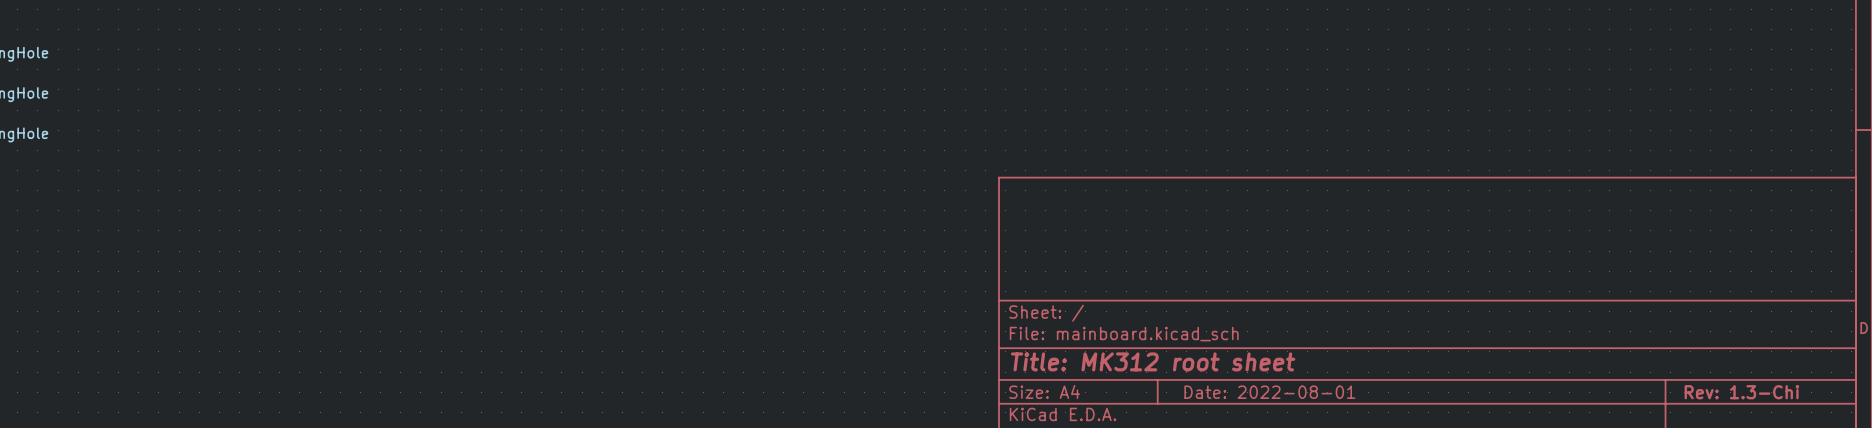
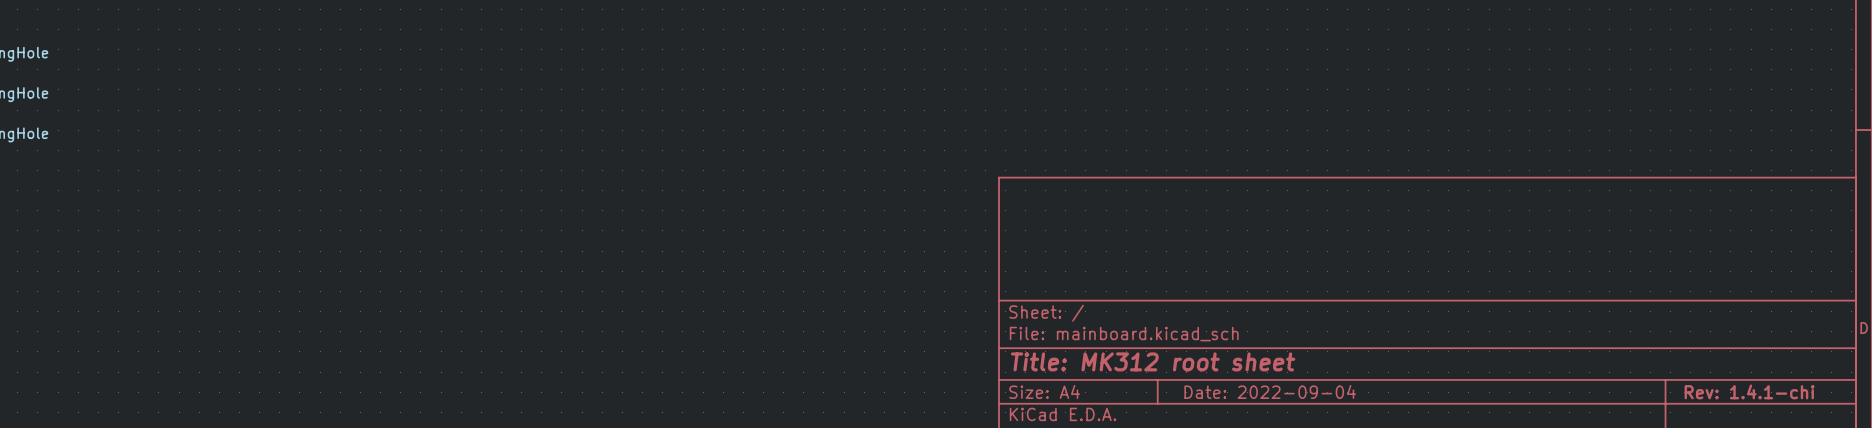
title block: Date: 2022-08-01 (1269, 392) -> Date: 2022-09-04 (1270, 391)
title block: Rev: 1.3-Chi (1741, 392) -> Rev: 1.4.1-chi (1749, 391)

